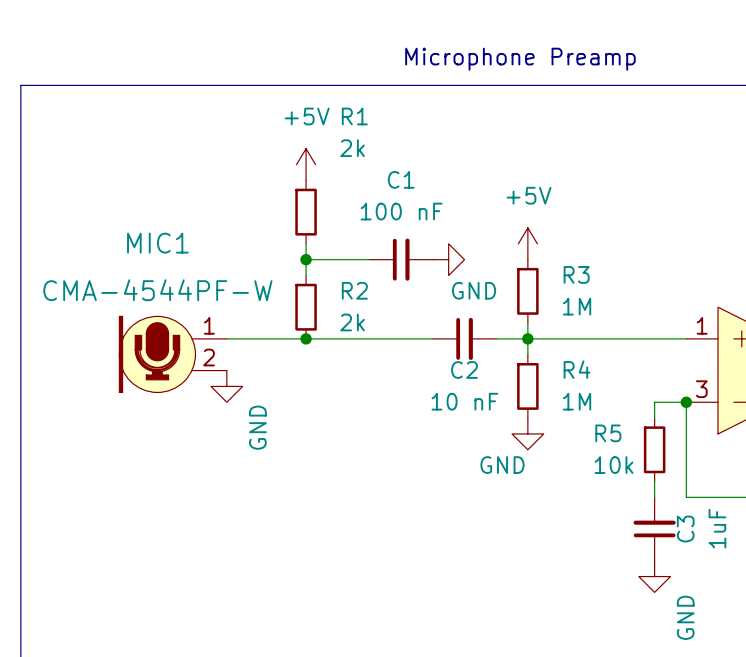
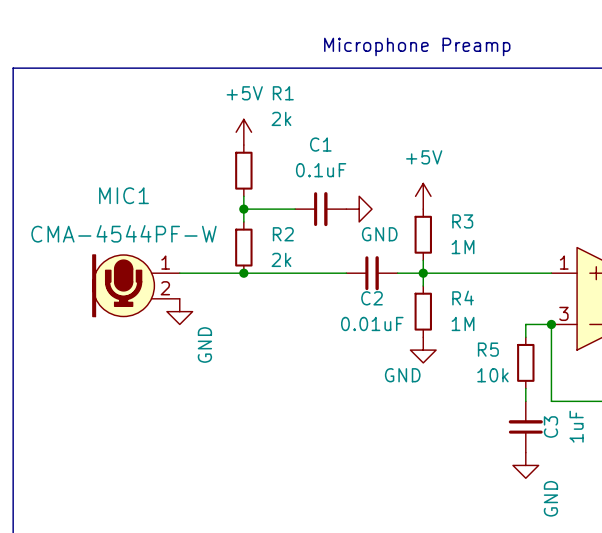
C1 value: 100 nF (401, 211) -> 0.1uF (321, 170)
C2 value: 10 nF (464, 401) -> 0.01uF (372, 323)

